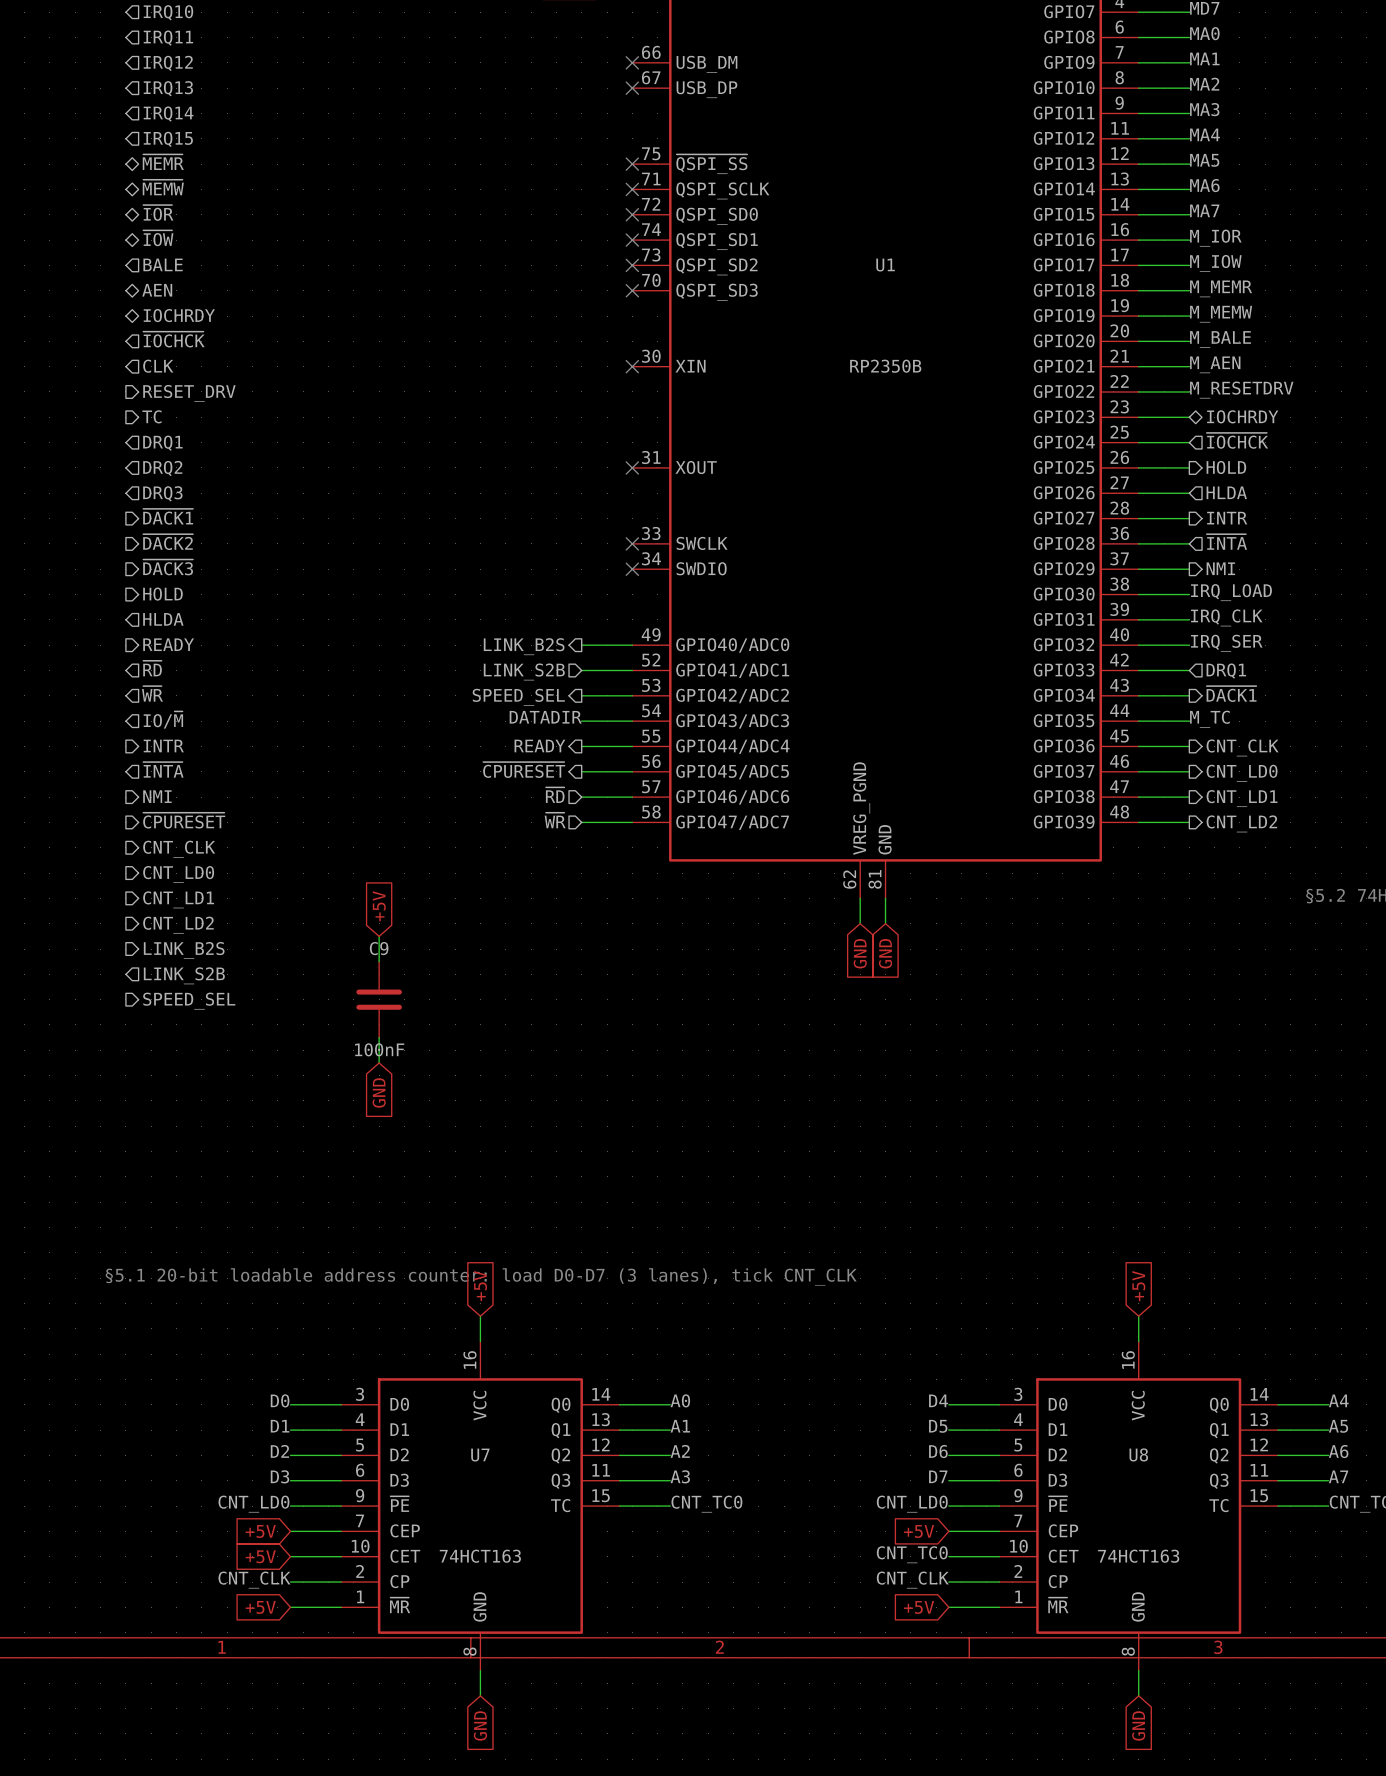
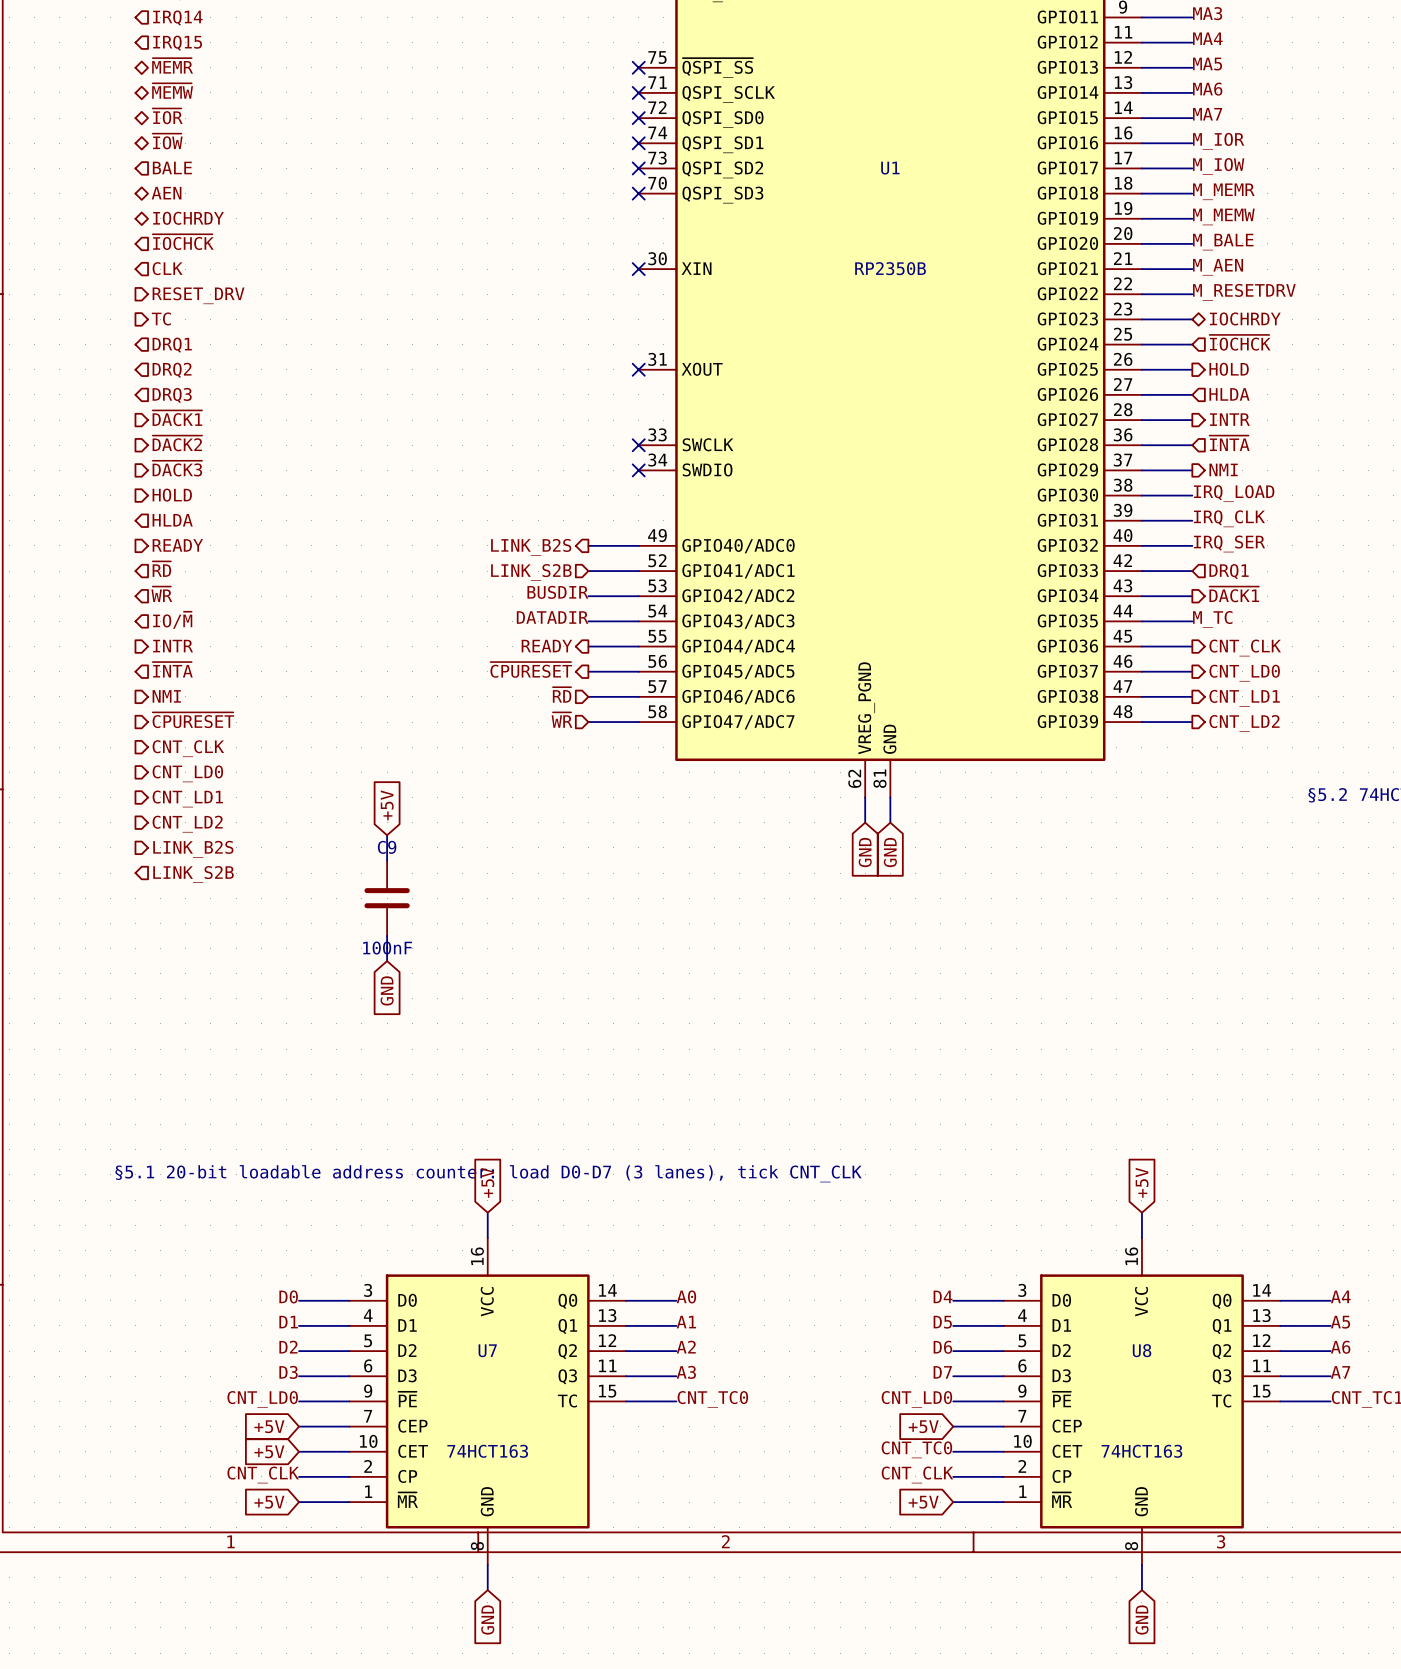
label: none -> BUSDIR (557, 592)
hierarchical label: SPEED_SEL (518, 697) -> none
hierarchical label: SPEED_SEL (189, 1001) -> none

